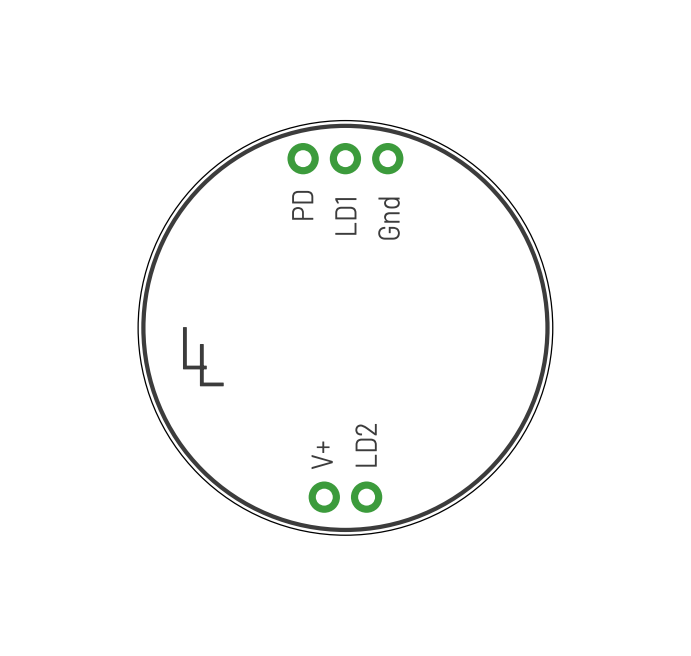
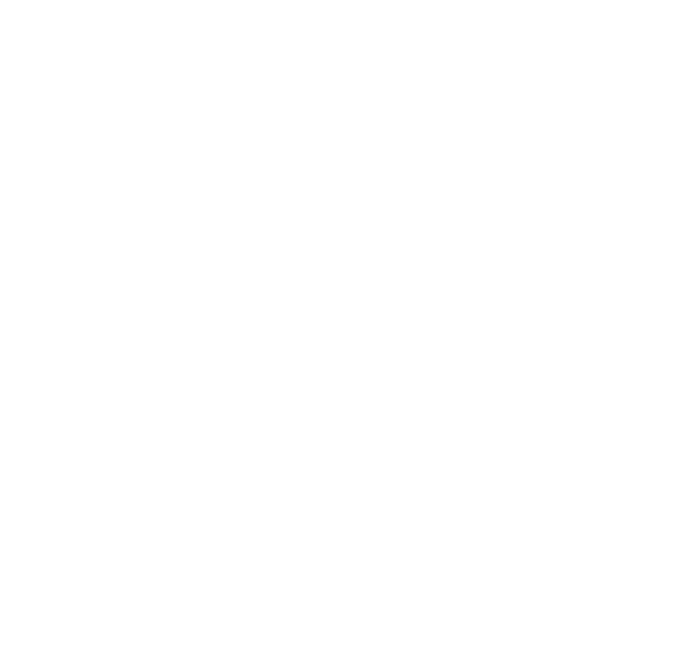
round board edge: [137, 120, 554, 536] -> none
drawing: [182, 327, 224, 387] -> none
part: (345, 327) -> none

